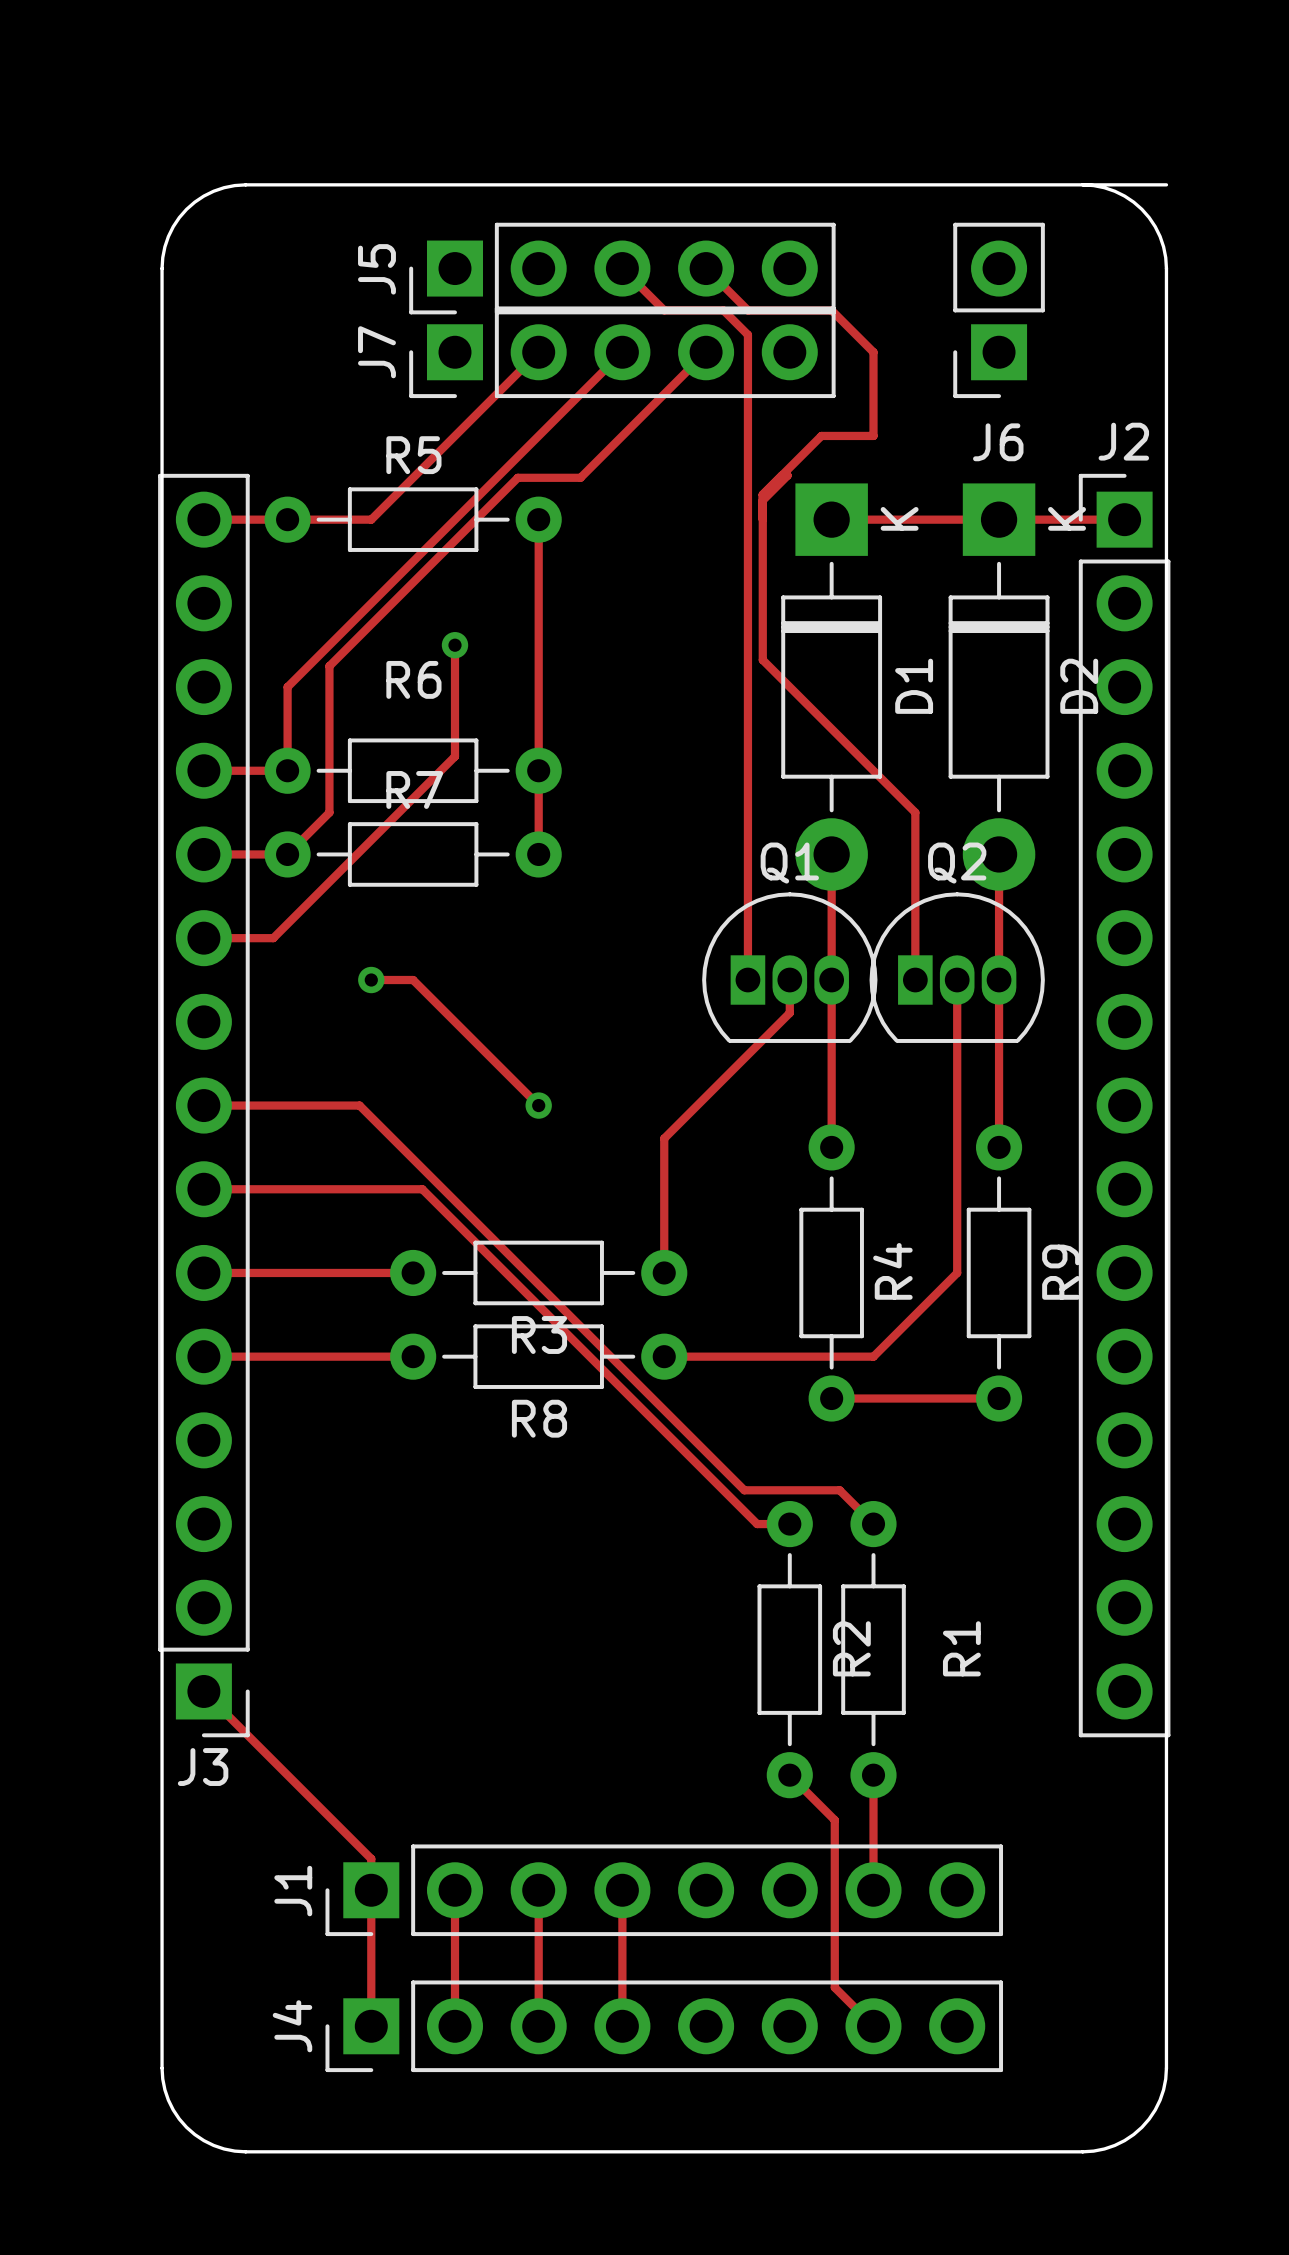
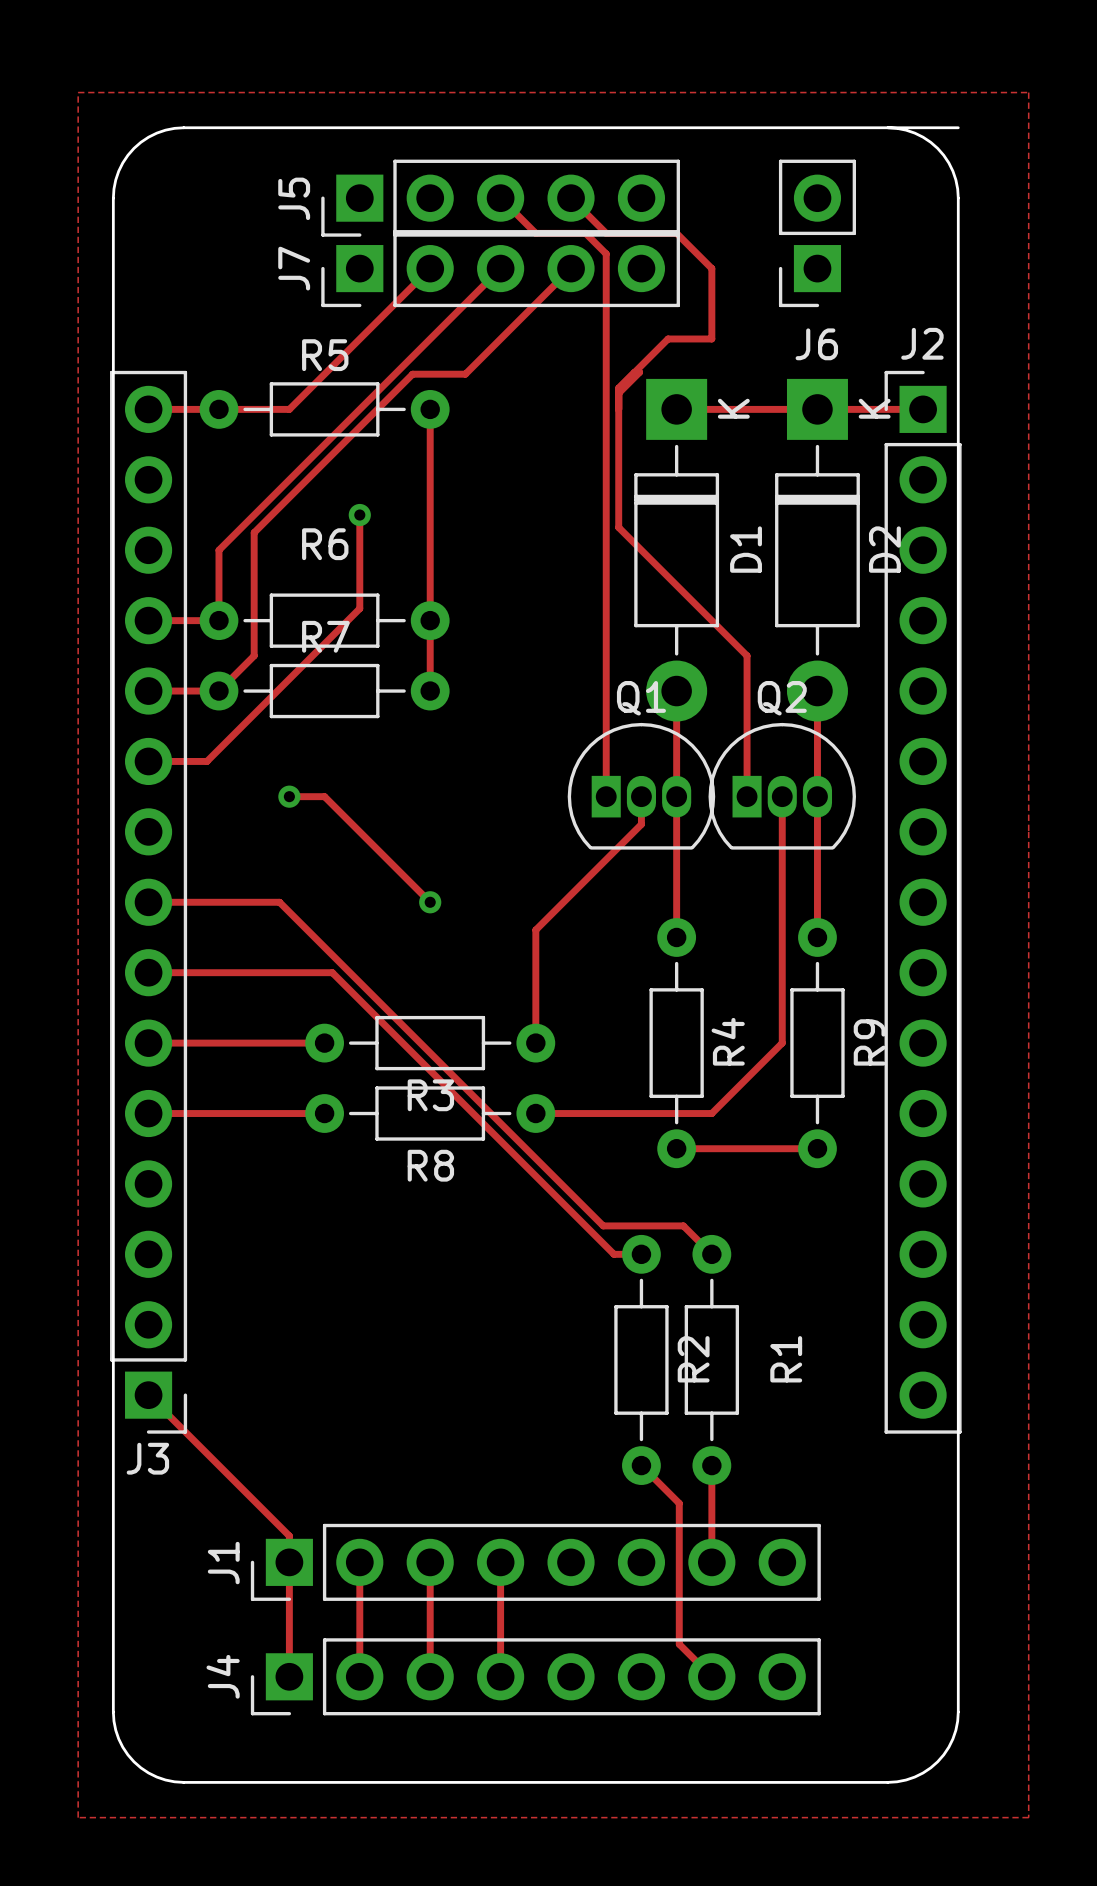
zone outline: none -> (78, 92) (78, 1817) (1028, 1817) (1028, 92) (78, 92)

